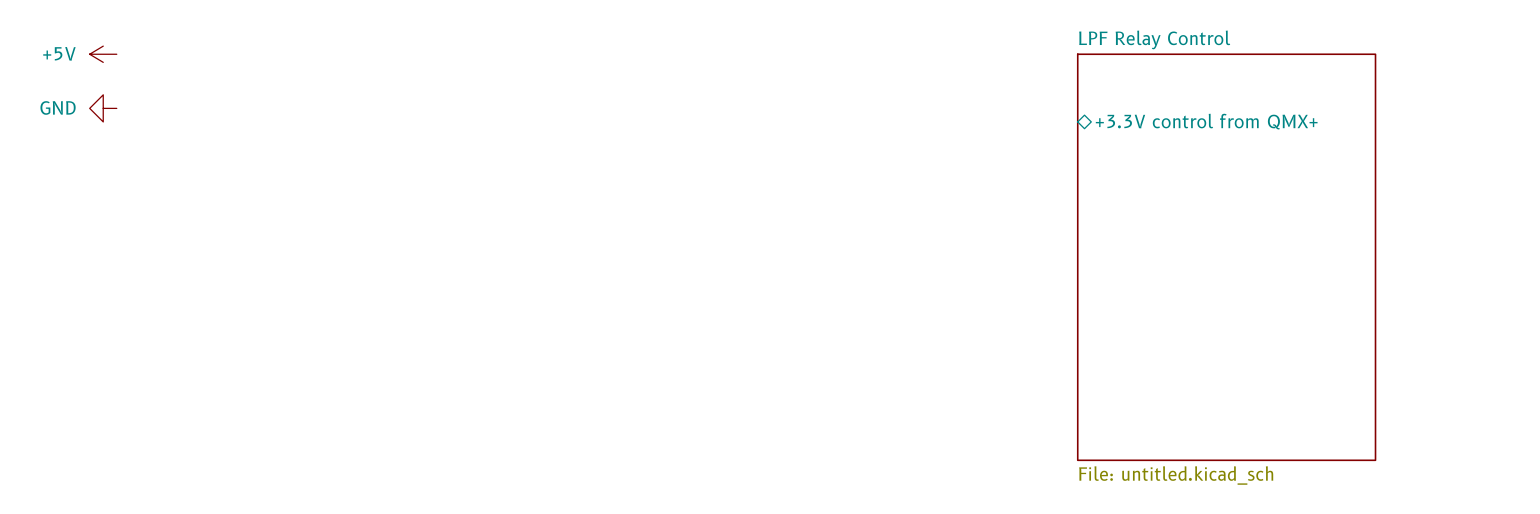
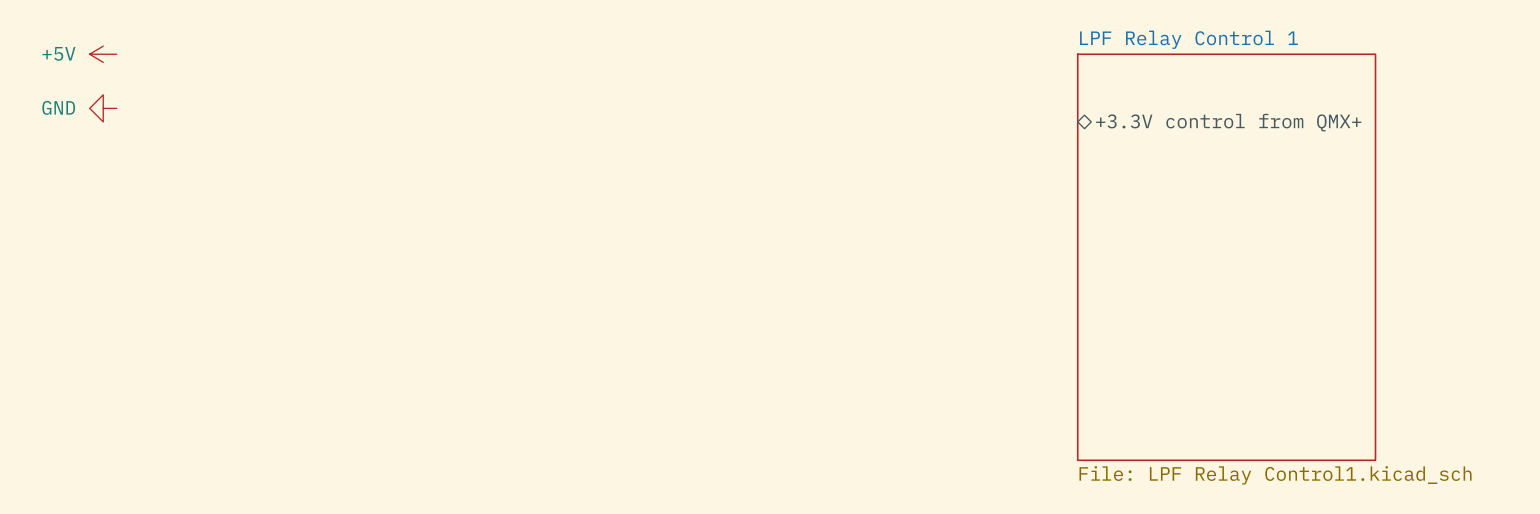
sheet LPF Relay Control name: LPF Relay Control (1154, 39) -> LPF Relay Control 1 (1188, 39)
sheet LPF Relay Control value: File: untitled.kicad_sch (1176, 475) -> File: LPF Relay Control1.kicad_sch (1275, 475)

